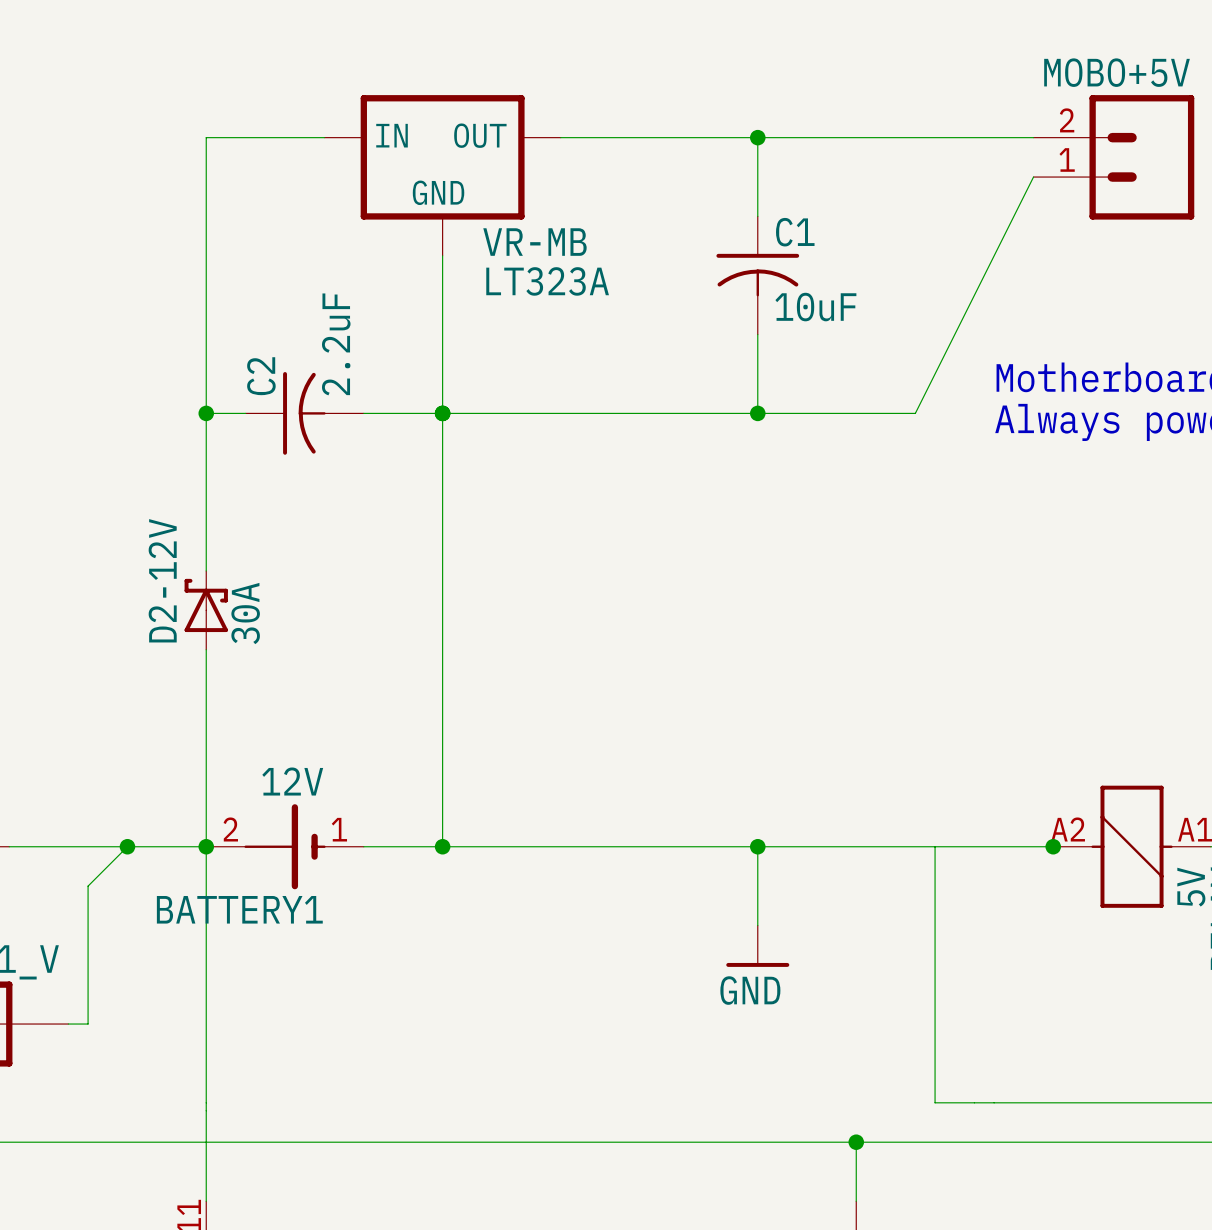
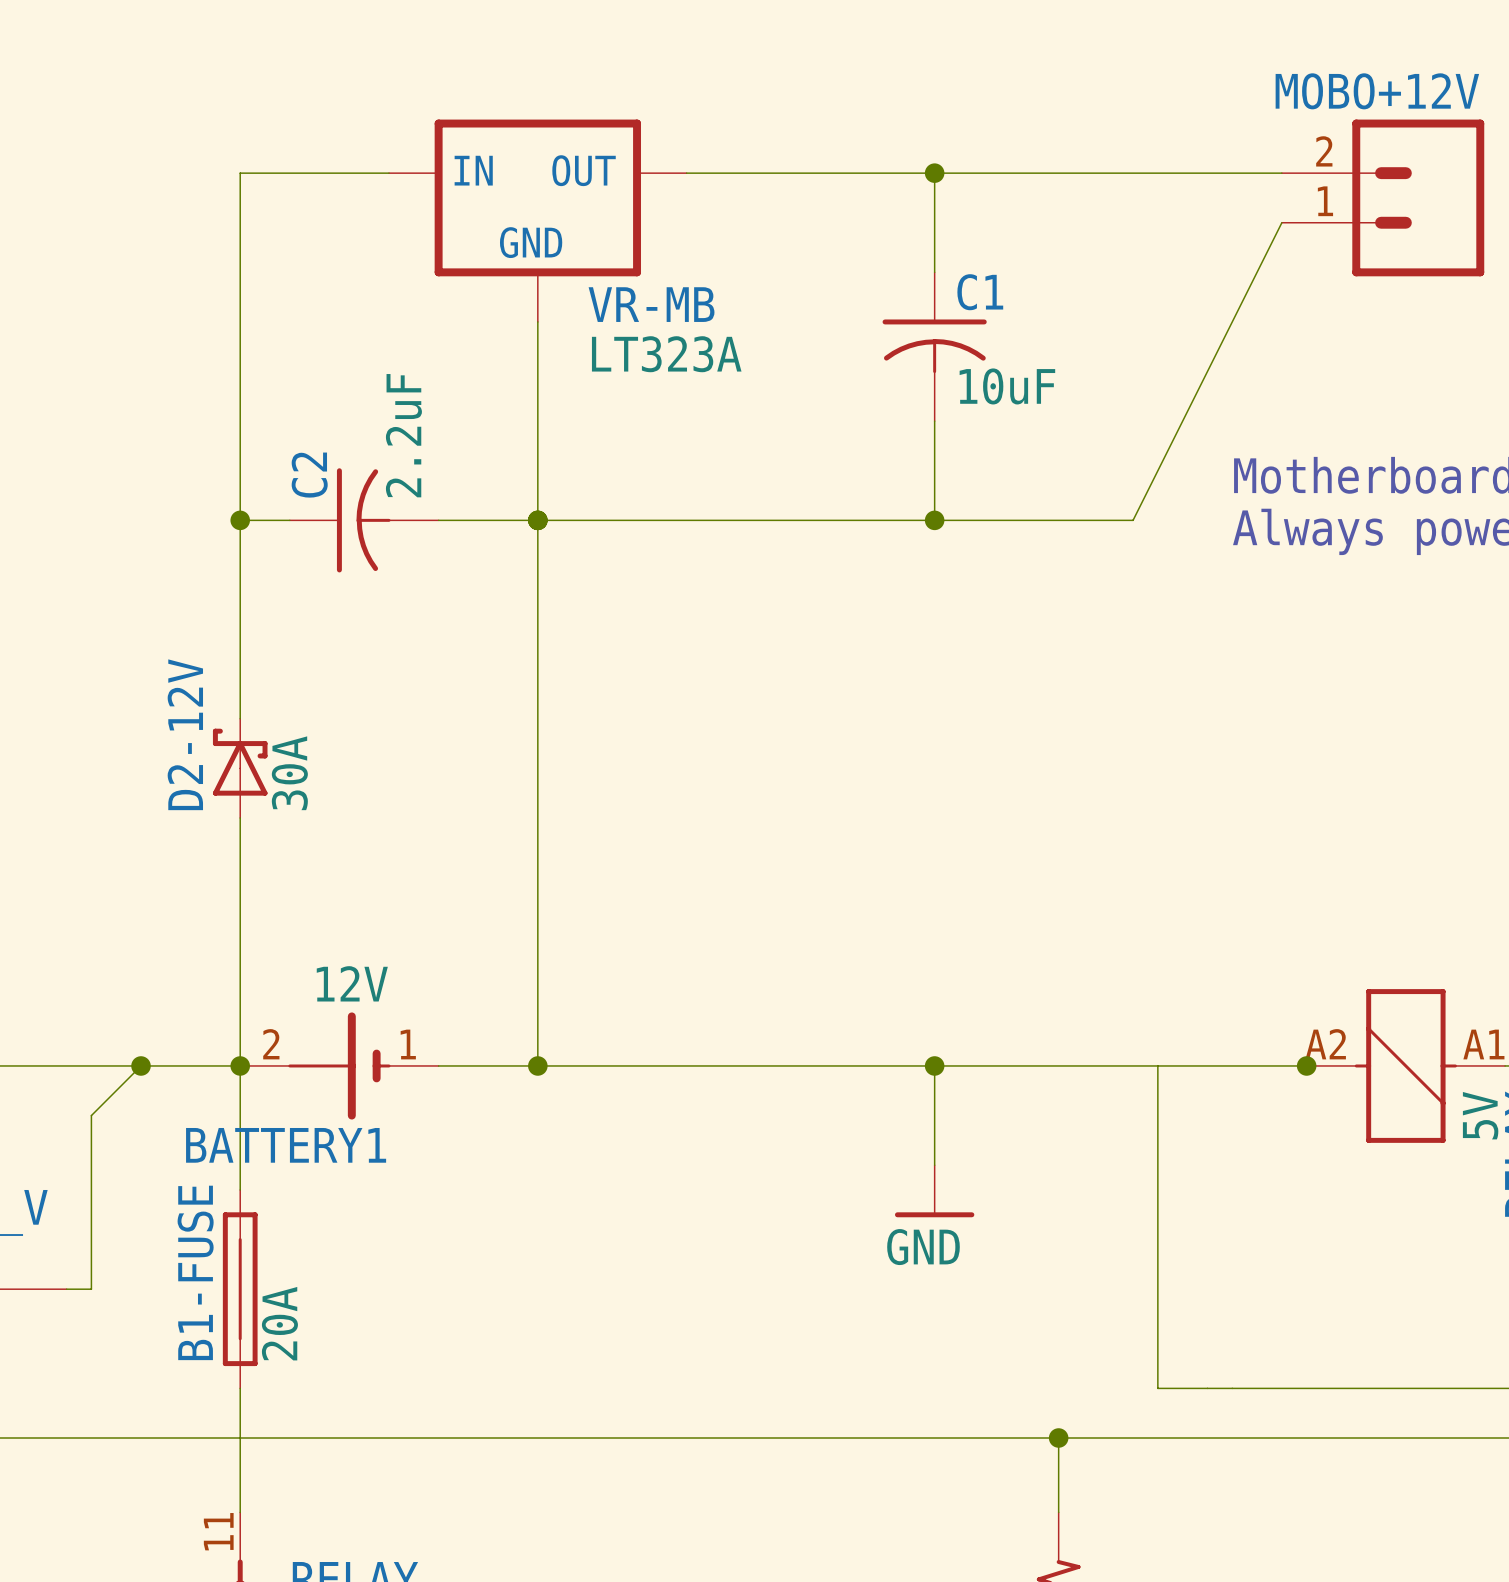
MOBO+5V name: MOBO+5V (1117, 72) -> MOBO+12V (1377, 91)
B1-FUSE: none -> 20A (240, 1289)

